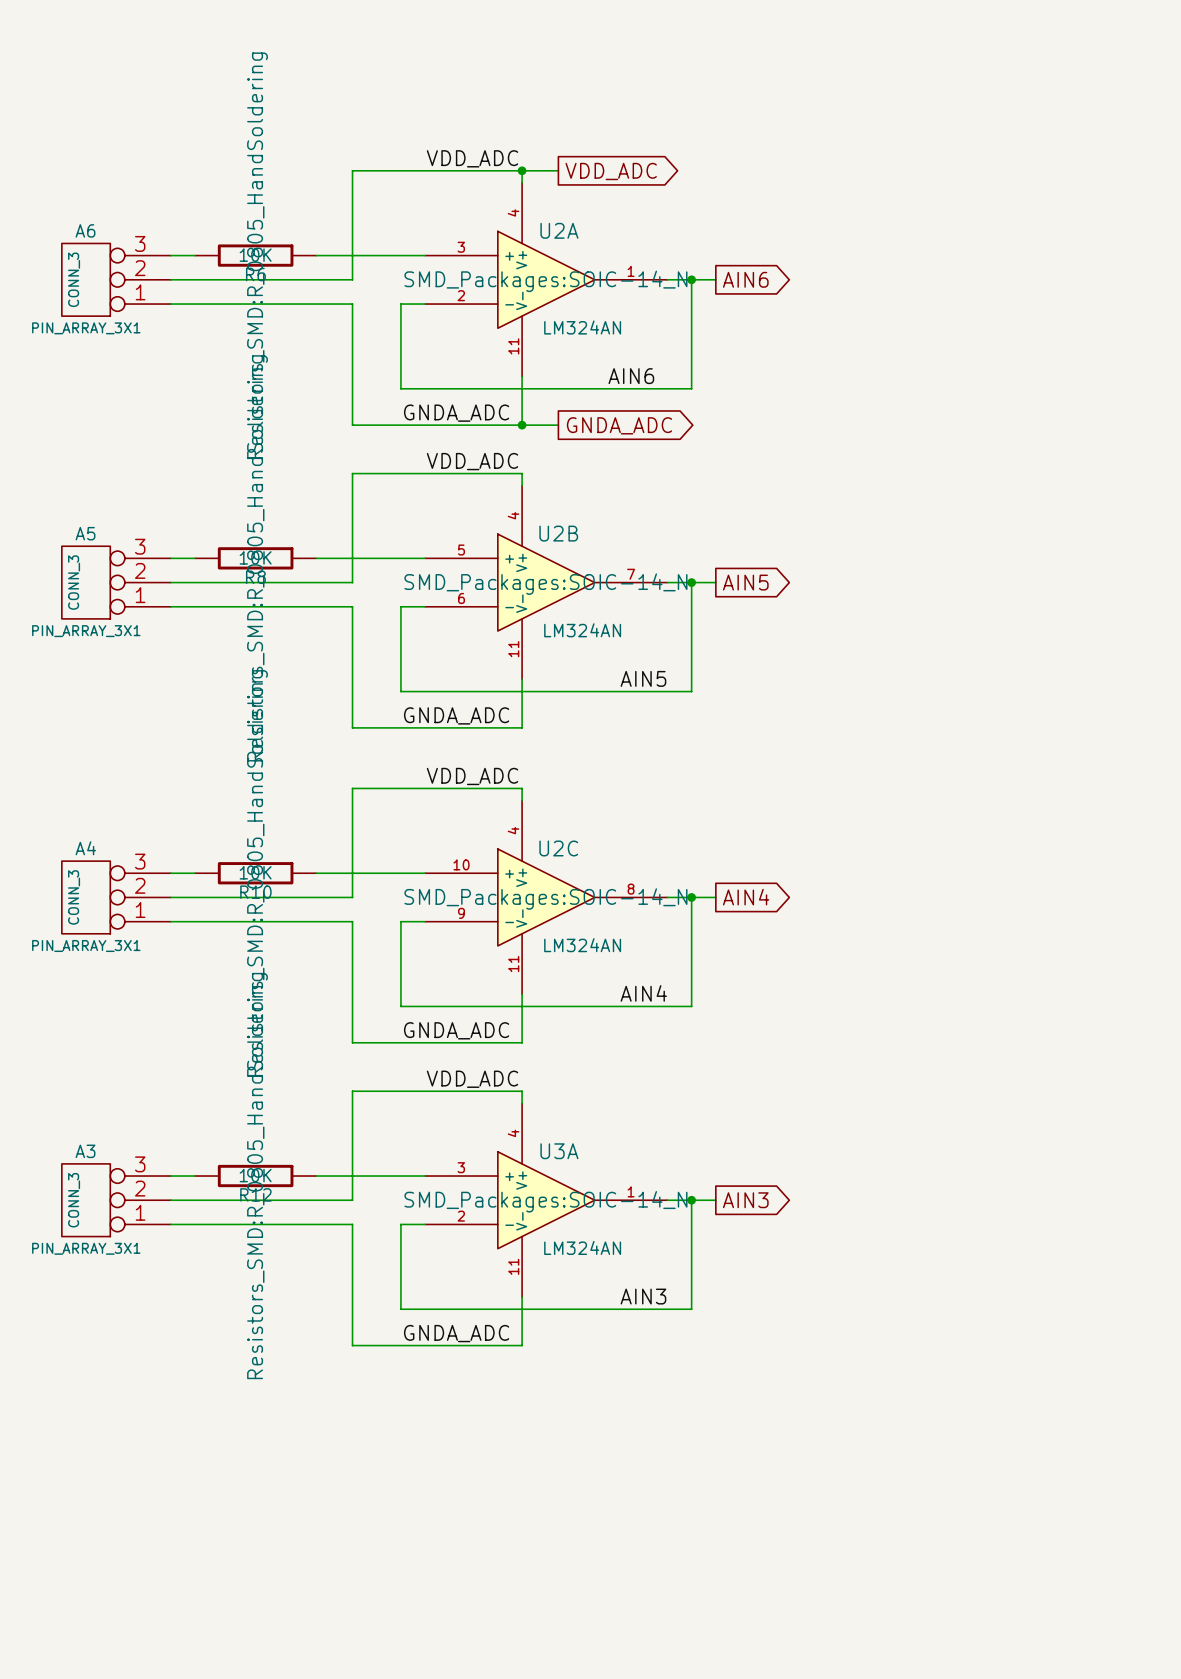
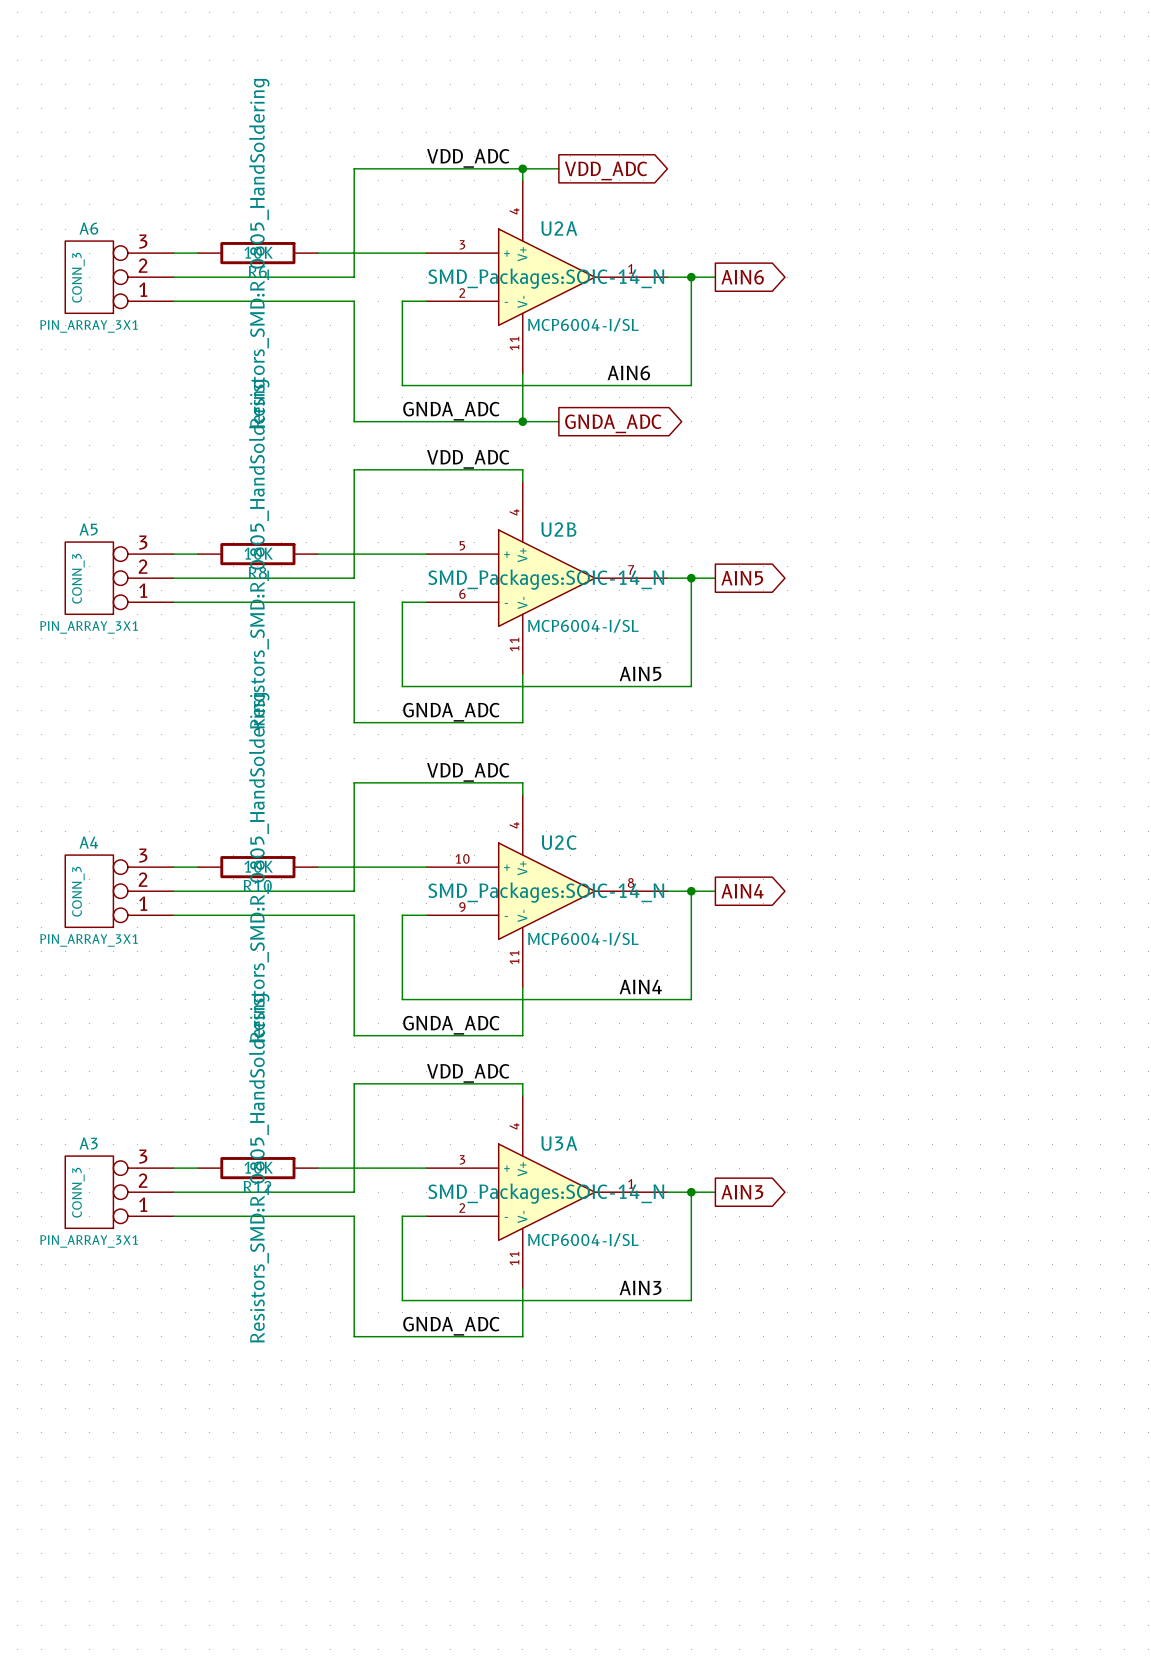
U2A value: LM324AN (582, 327) -> MCP6004-I/SL (583, 324)
U2B value: LM324AN (582, 630) -> MCP6004-I/SL (583, 625)
U2C value: LM324AN (582, 945) -> MCP6004-I/SL (583, 938)
U3A value: LM324AN (582, 1247) -> MCP6004-I/SL (583, 1239)

